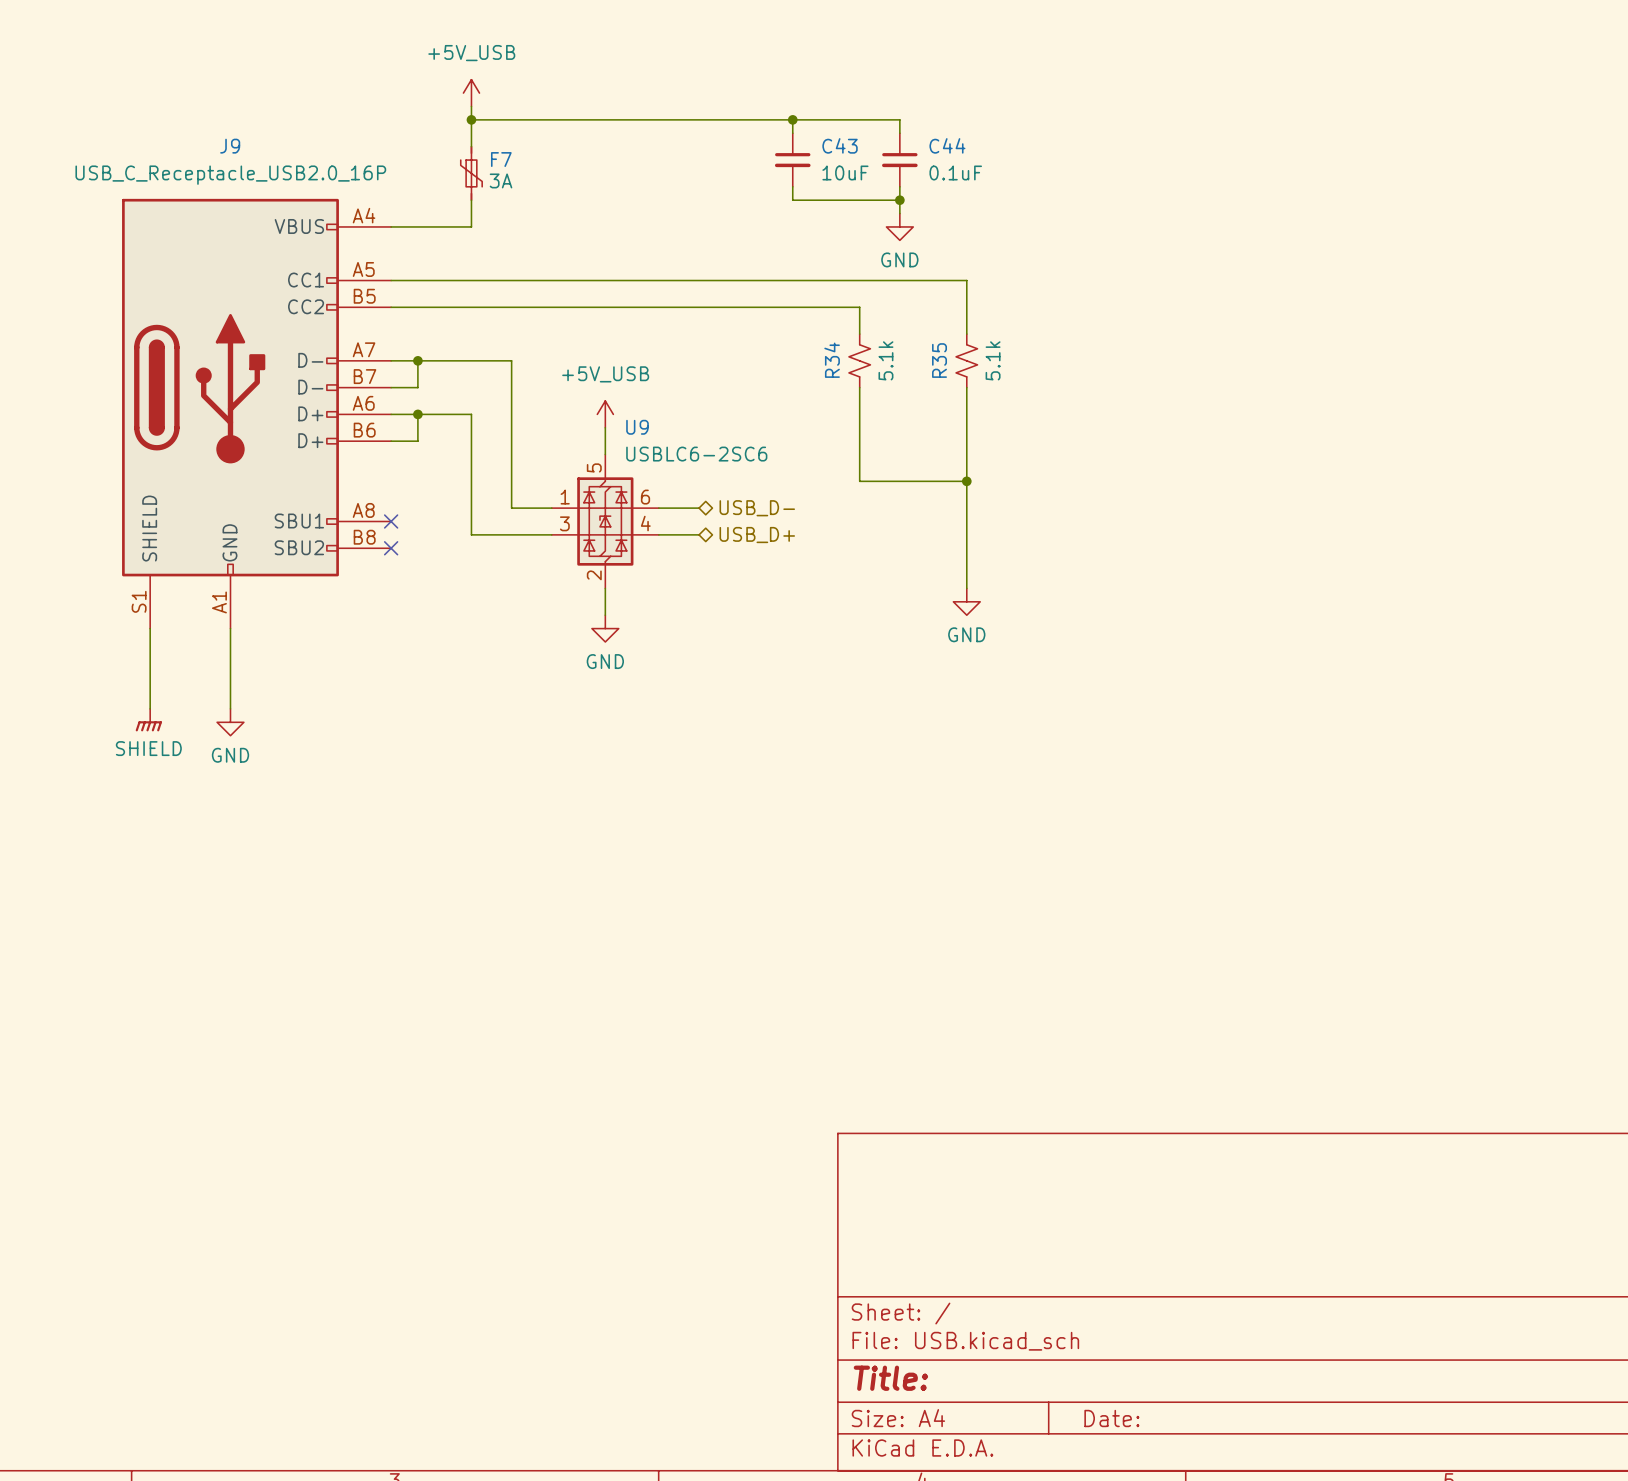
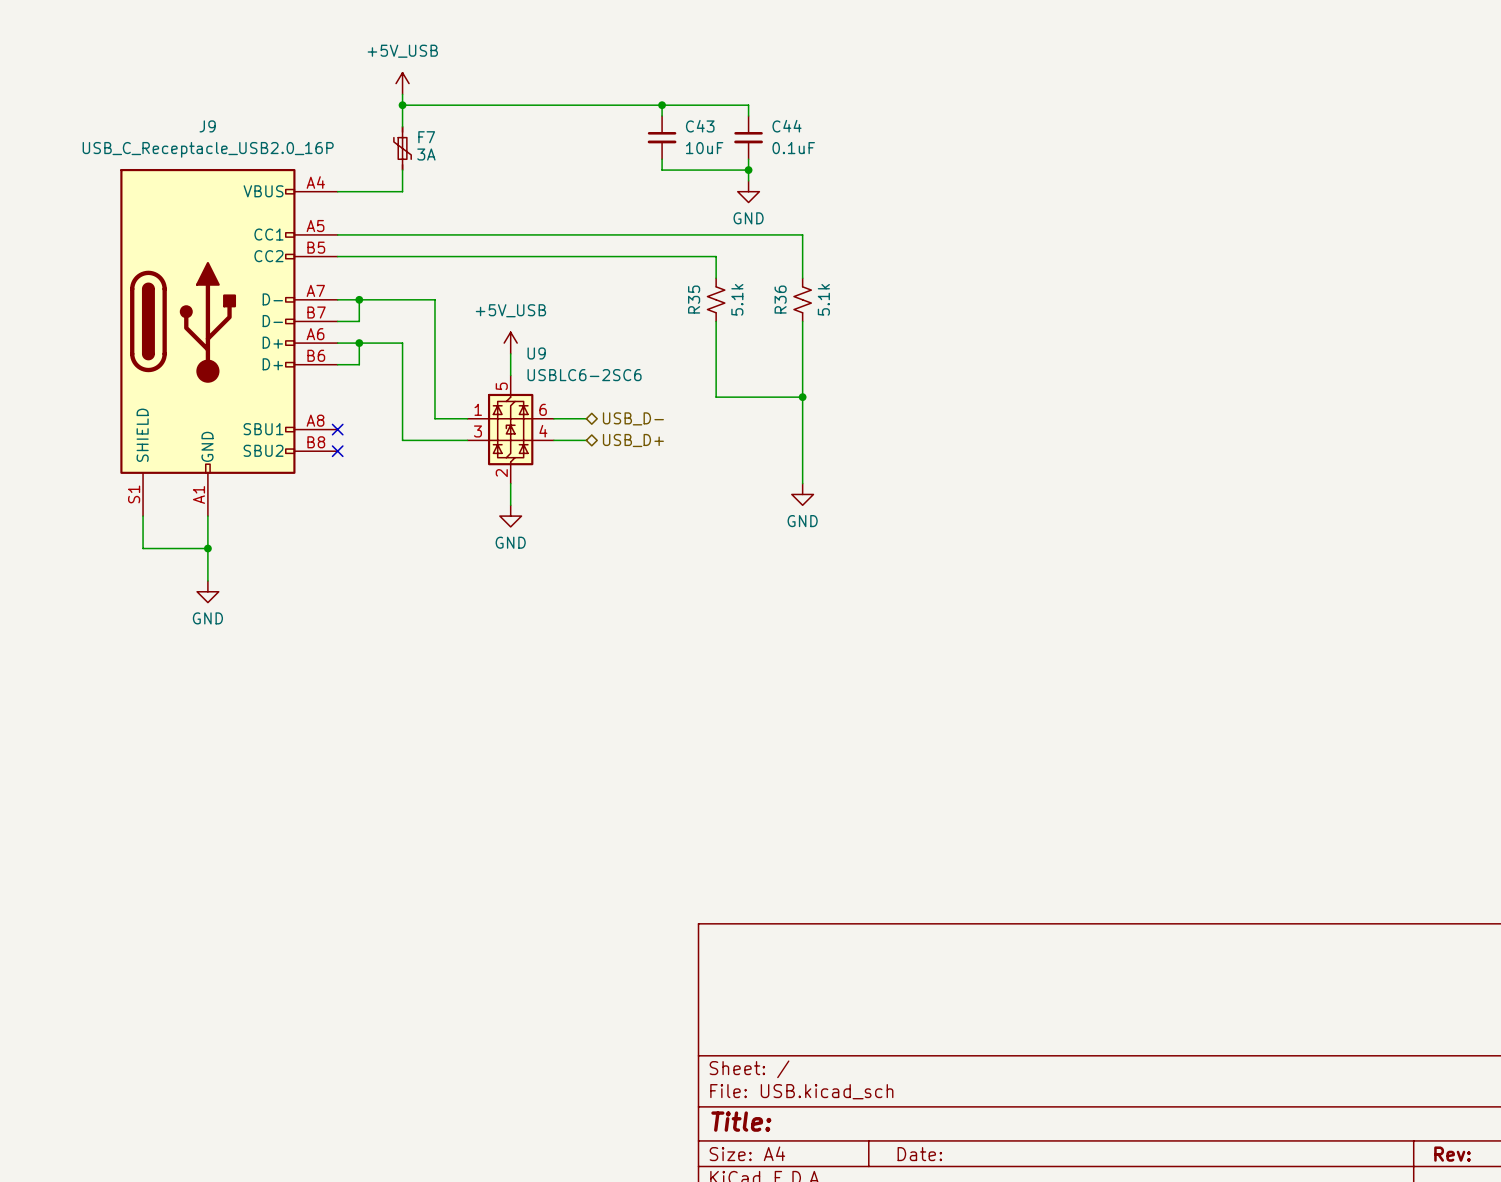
R34 name: R34 (832, 360) -> R35 (694, 299)
R35 name: R35 (939, 360) -> R36 (780, 299)
wire: (150, 668) (150, 708) -> (143, 548) (207, 548)
junction: none -> (207, 548)
power symbol: SHIELD (148, 720) -> none

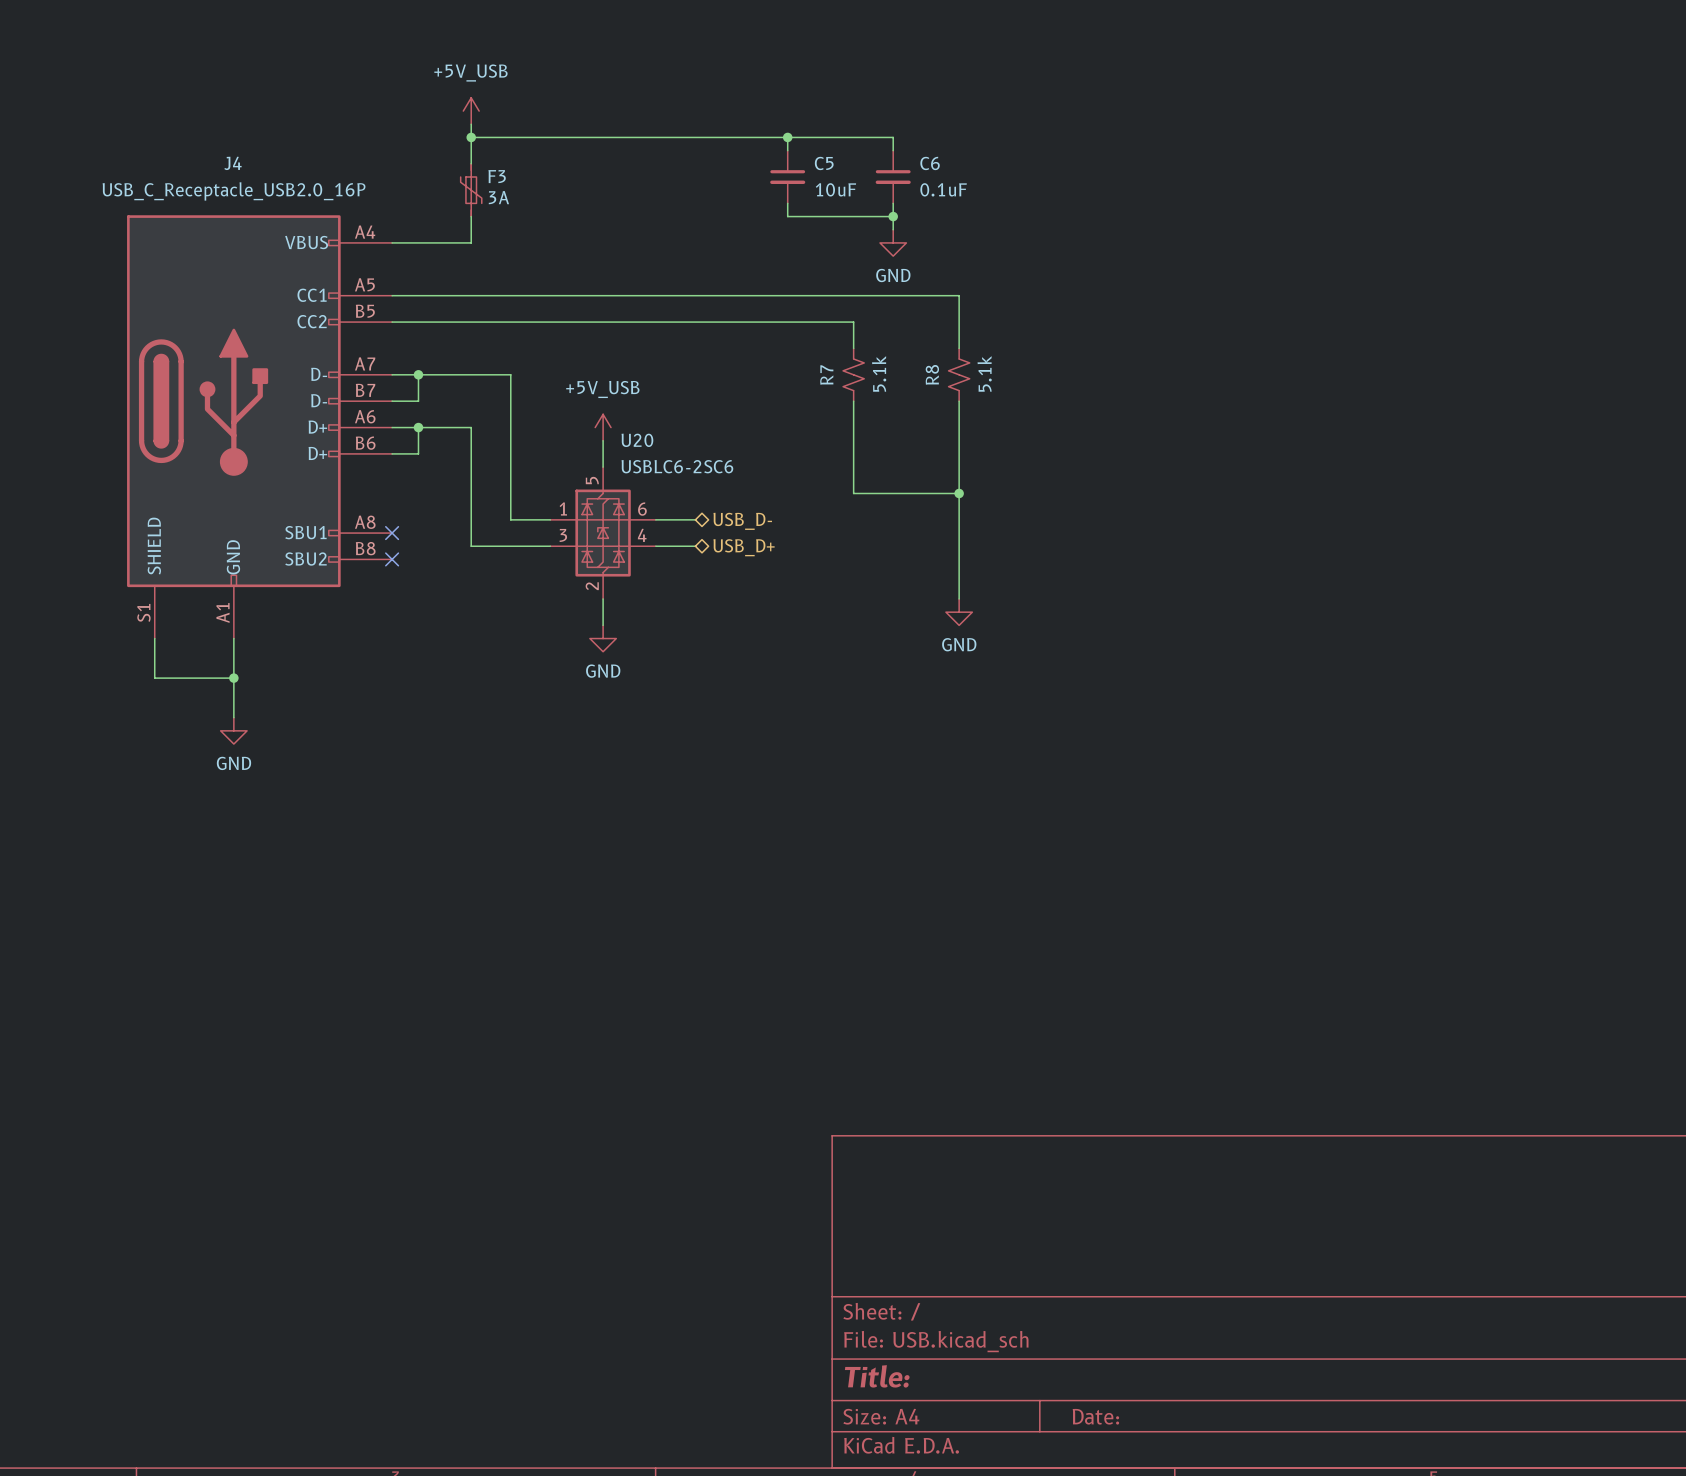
J9 name: J9 (207, 126) -> J4 (232, 163)
C43 name: C43 (700, 126) -> C5 (824, 163)
C44 name: C44 (787, 126) -> C6 (930, 163)
F7 name: F7 (426, 137) -> F3 (497, 176)
R35 name: R35 (694, 299) -> R7 (826, 375)
R36 name: R36 (780, 299) -> R8 (932, 374)
U9 name: U9 (536, 353) -> U20 (637, 440)

